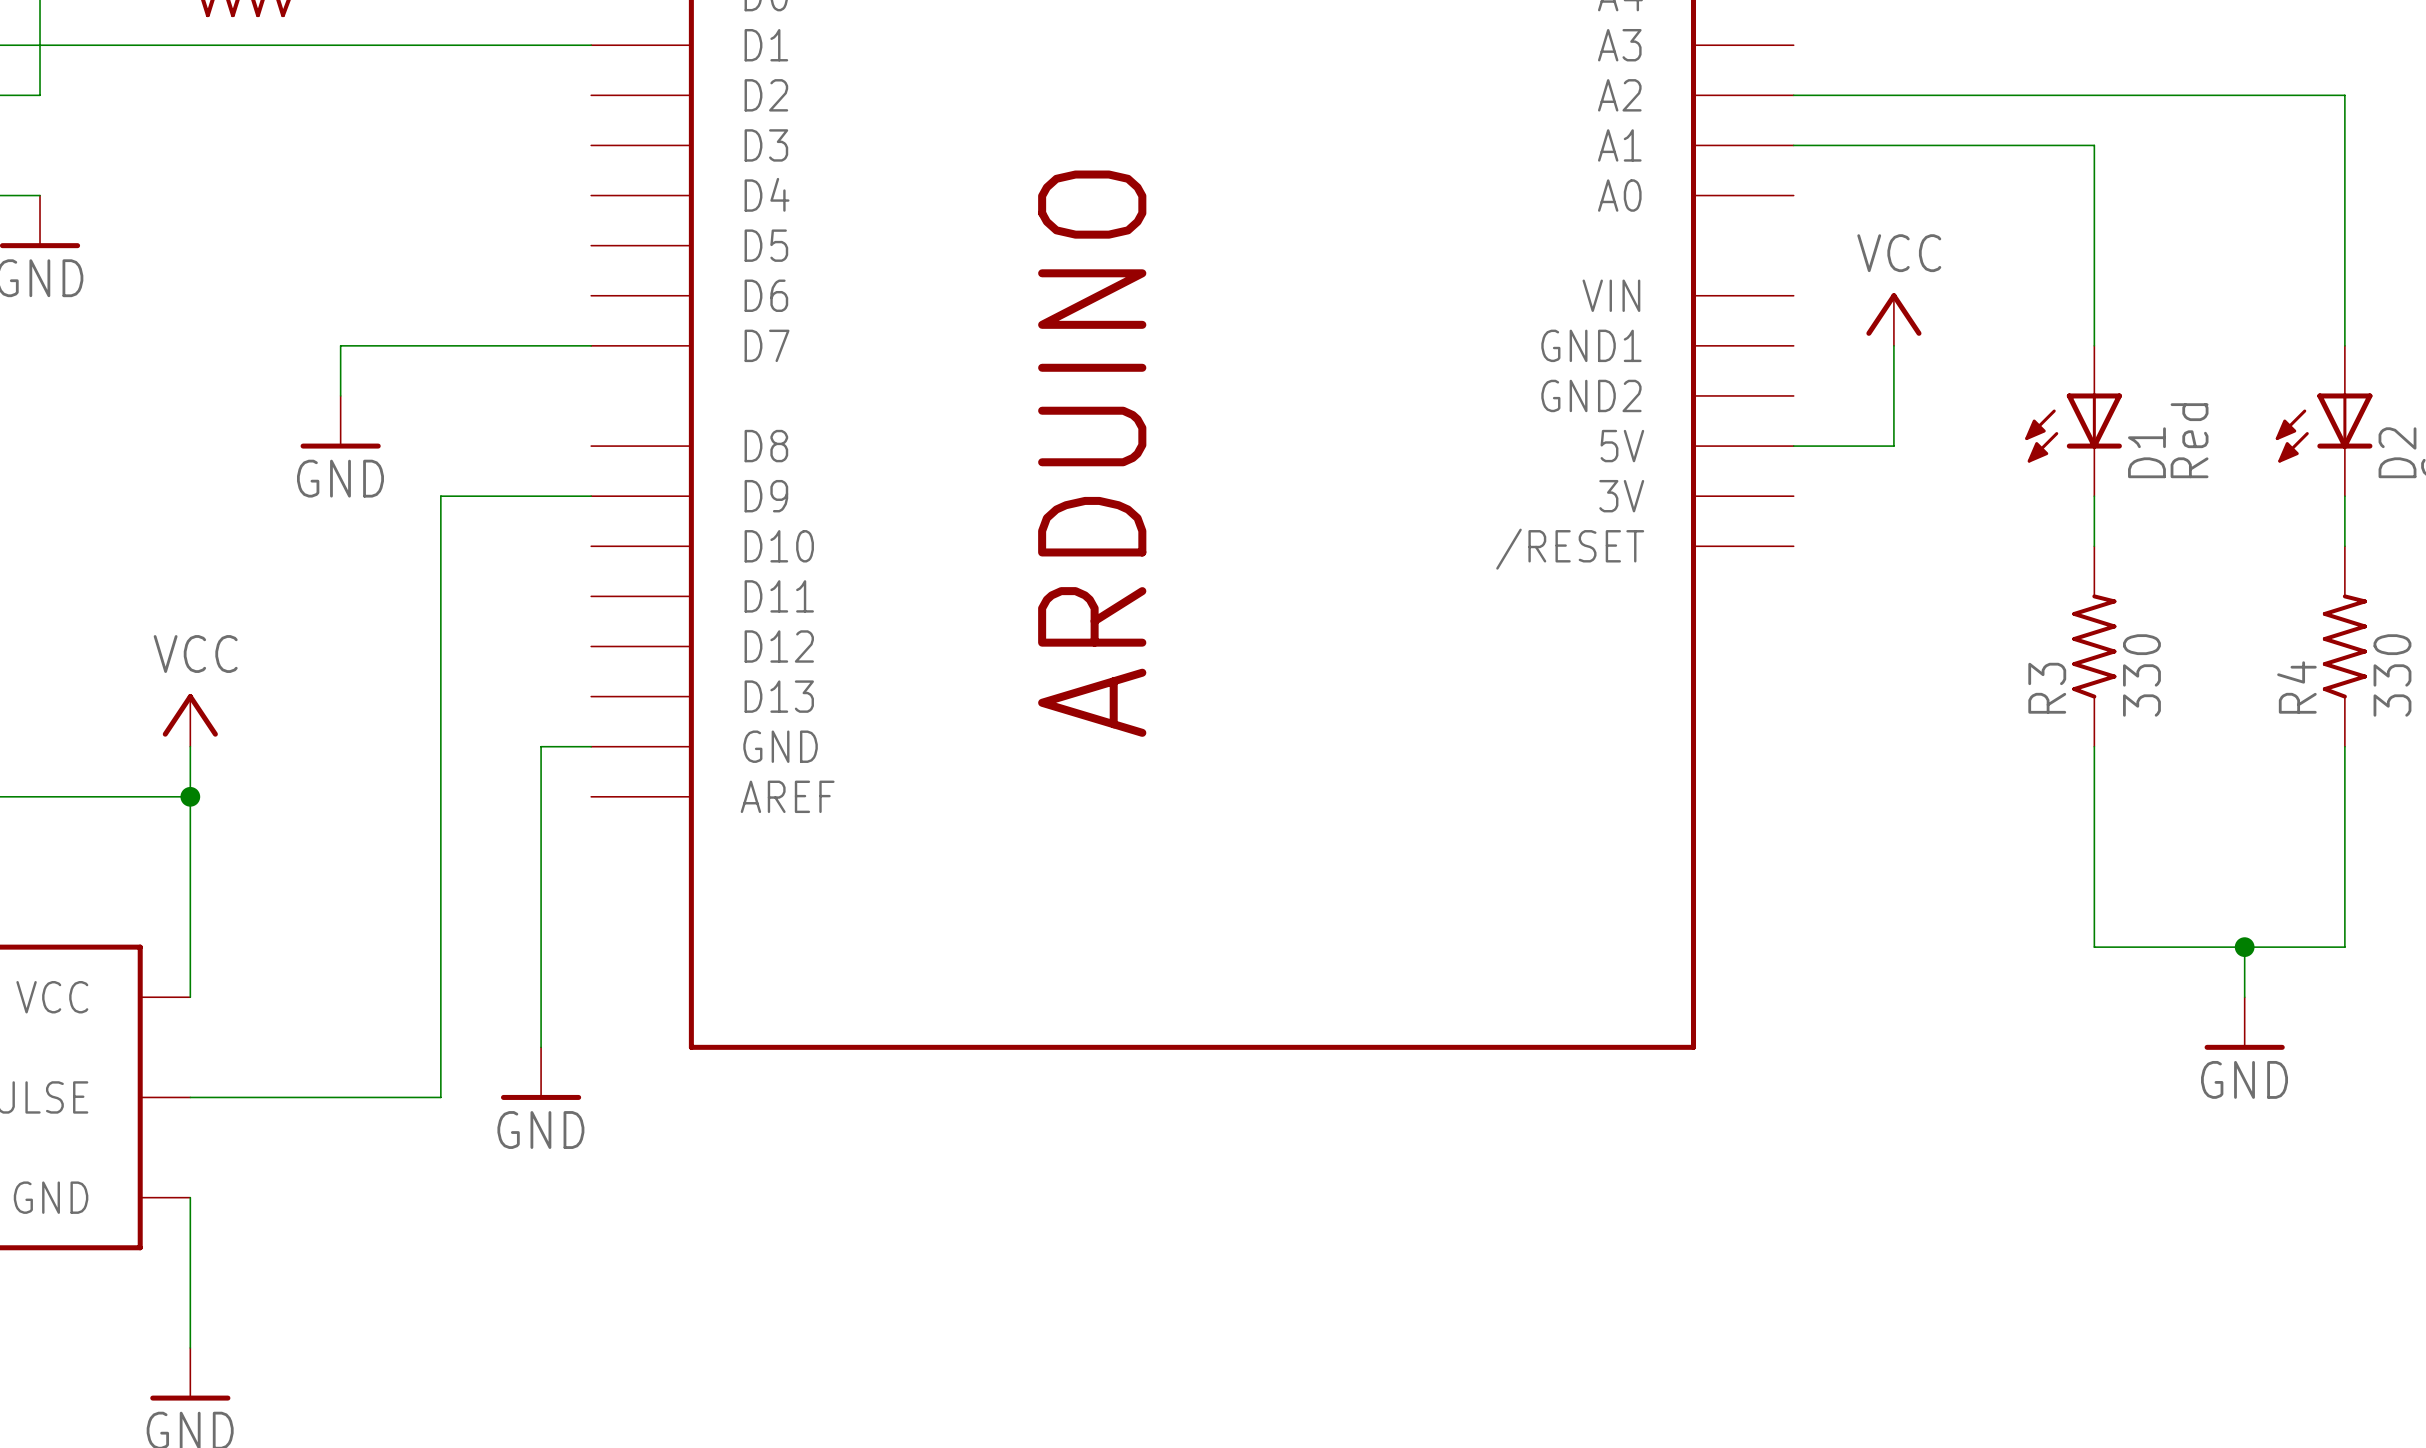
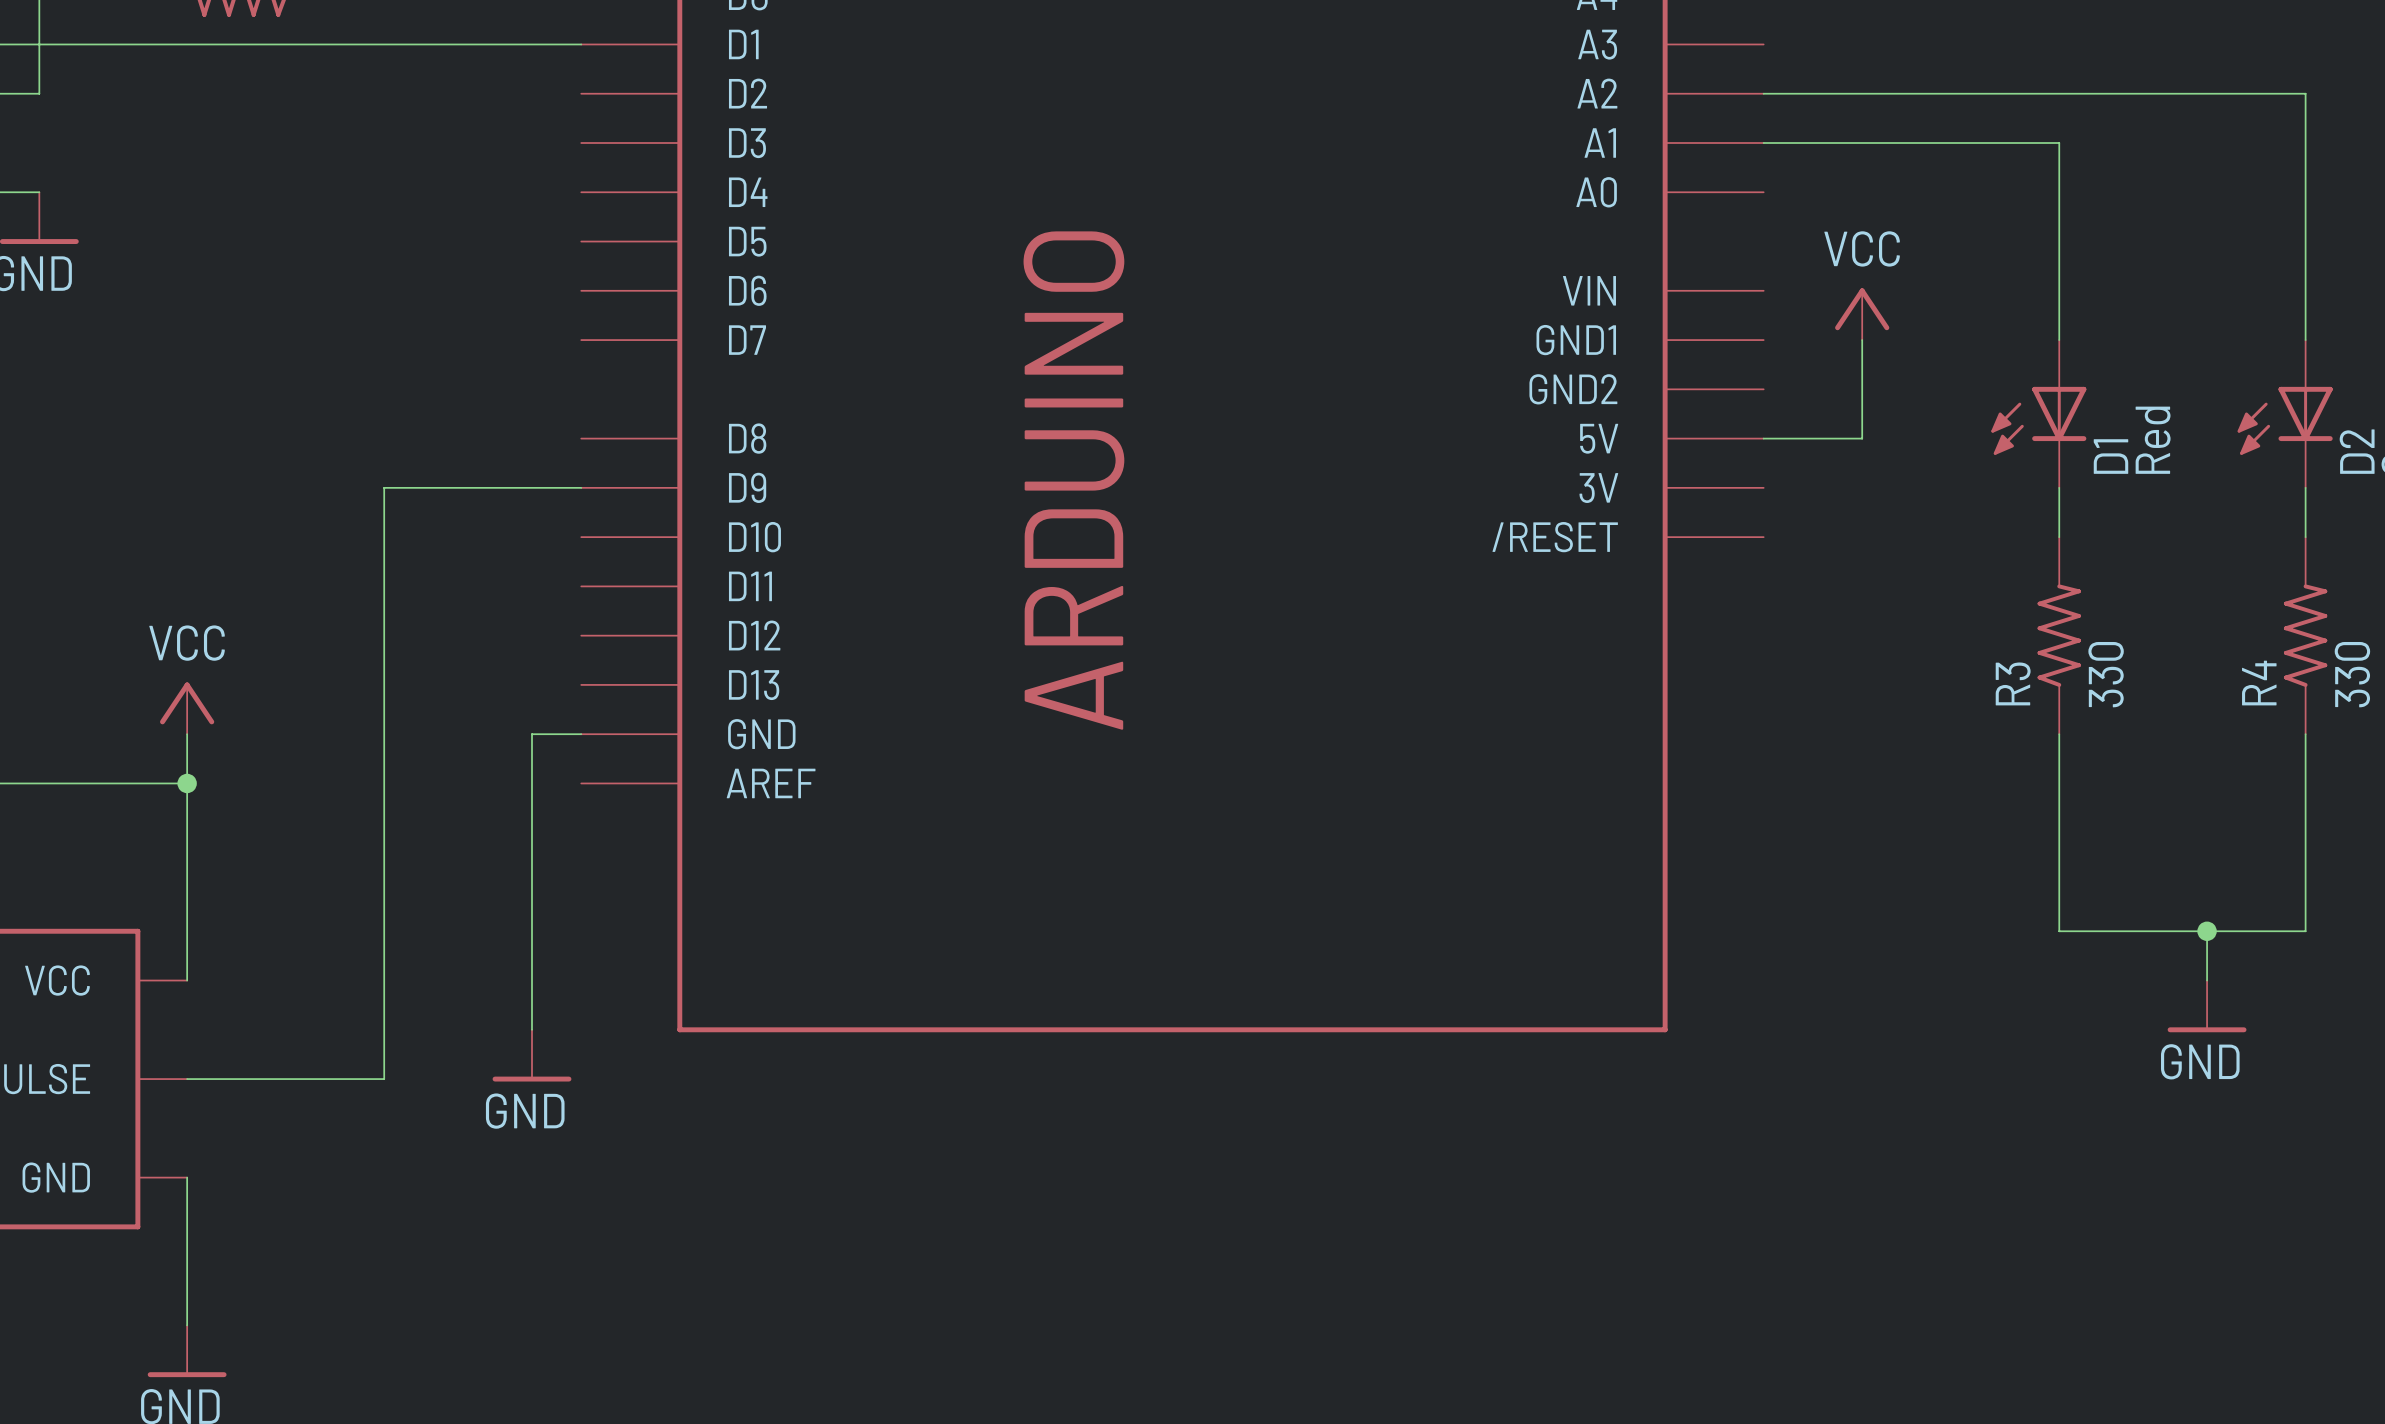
wire: (591, 345) (340, 345) (340, 395) -> none
power symbol: GND (340, 422) -> none
wire: (440, 496) (440, 1097) (390, 1097) -> (433, 487) (384, 487) (384, 1079)

